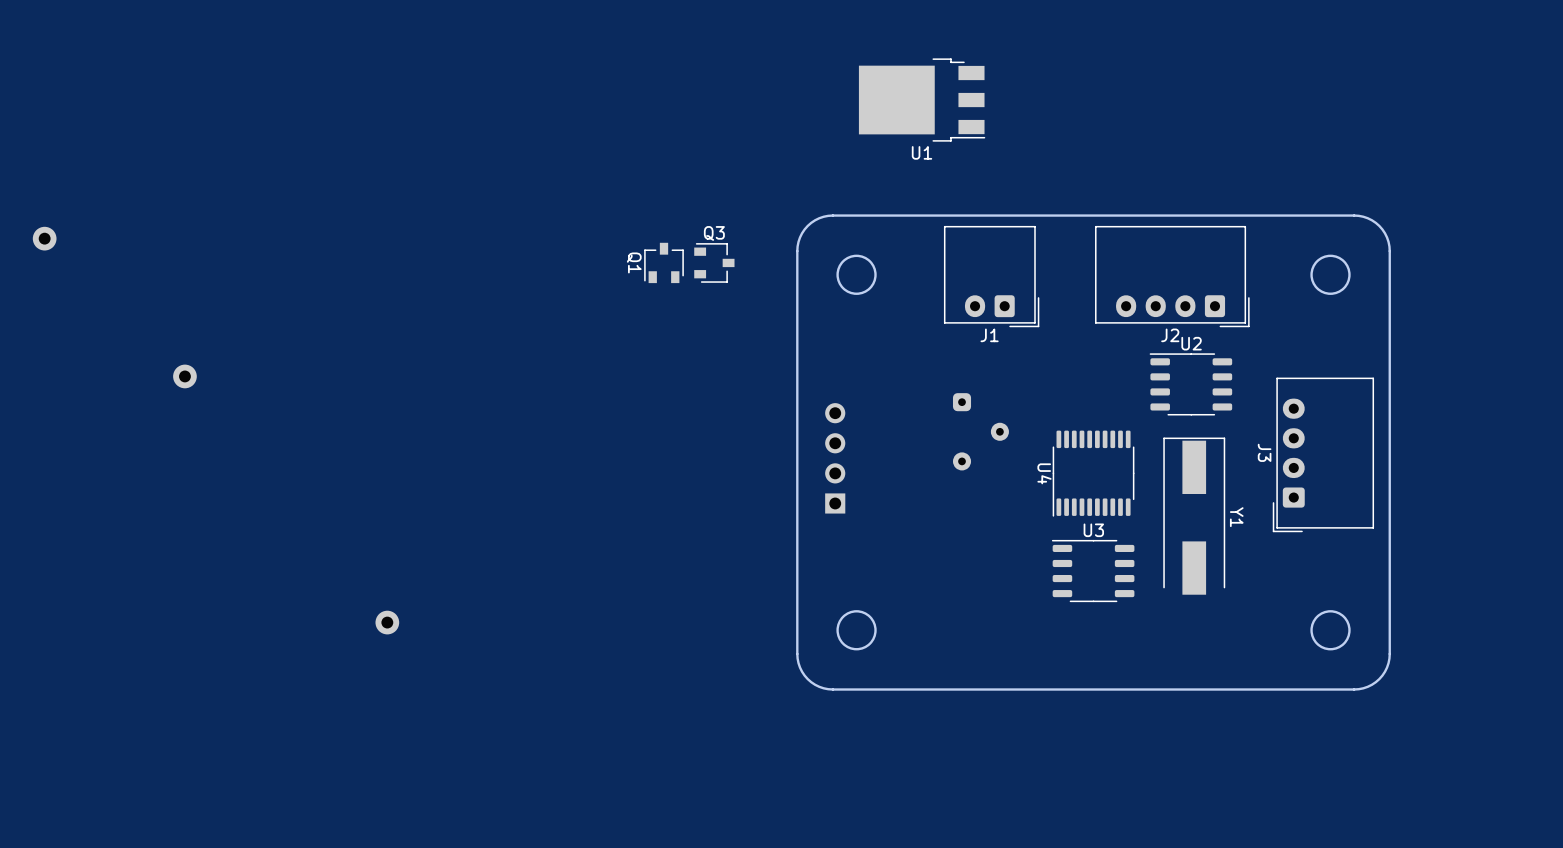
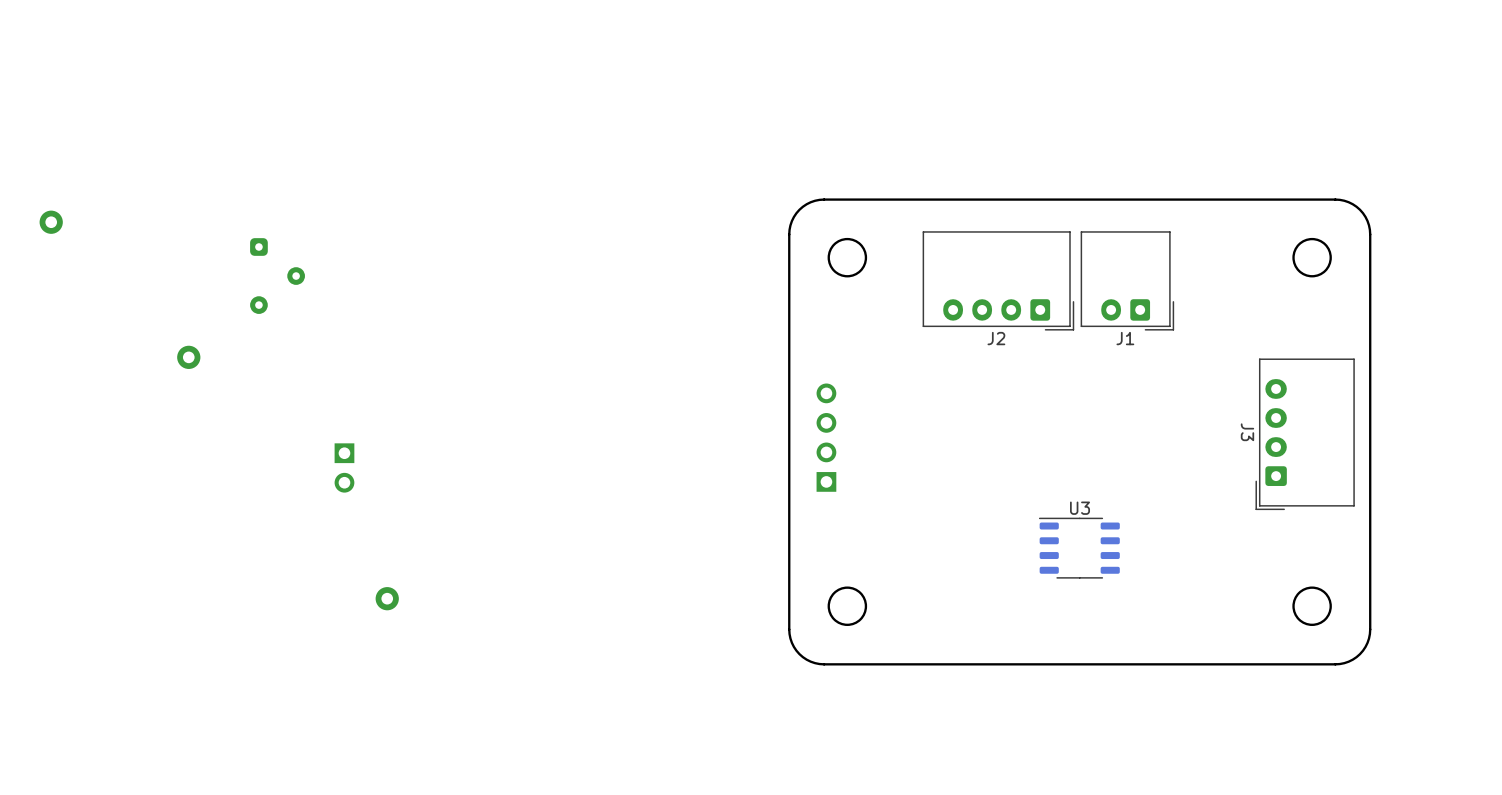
U1: (922, 100) -> none
Q1: (664, 262) -> none
Q3: (714, 262) -> none
J1 position: (991, 276) -> (1127, 280)
J2 position: (1172, 276) -> (998, 280)
part: none -> (277, 276)
U2: (1190, 384) -> none
part: (980, 431) -> none
U4: (1093, 473) -> none
part: none -> (344, 467)
Y1: (1194, 516) -> none

